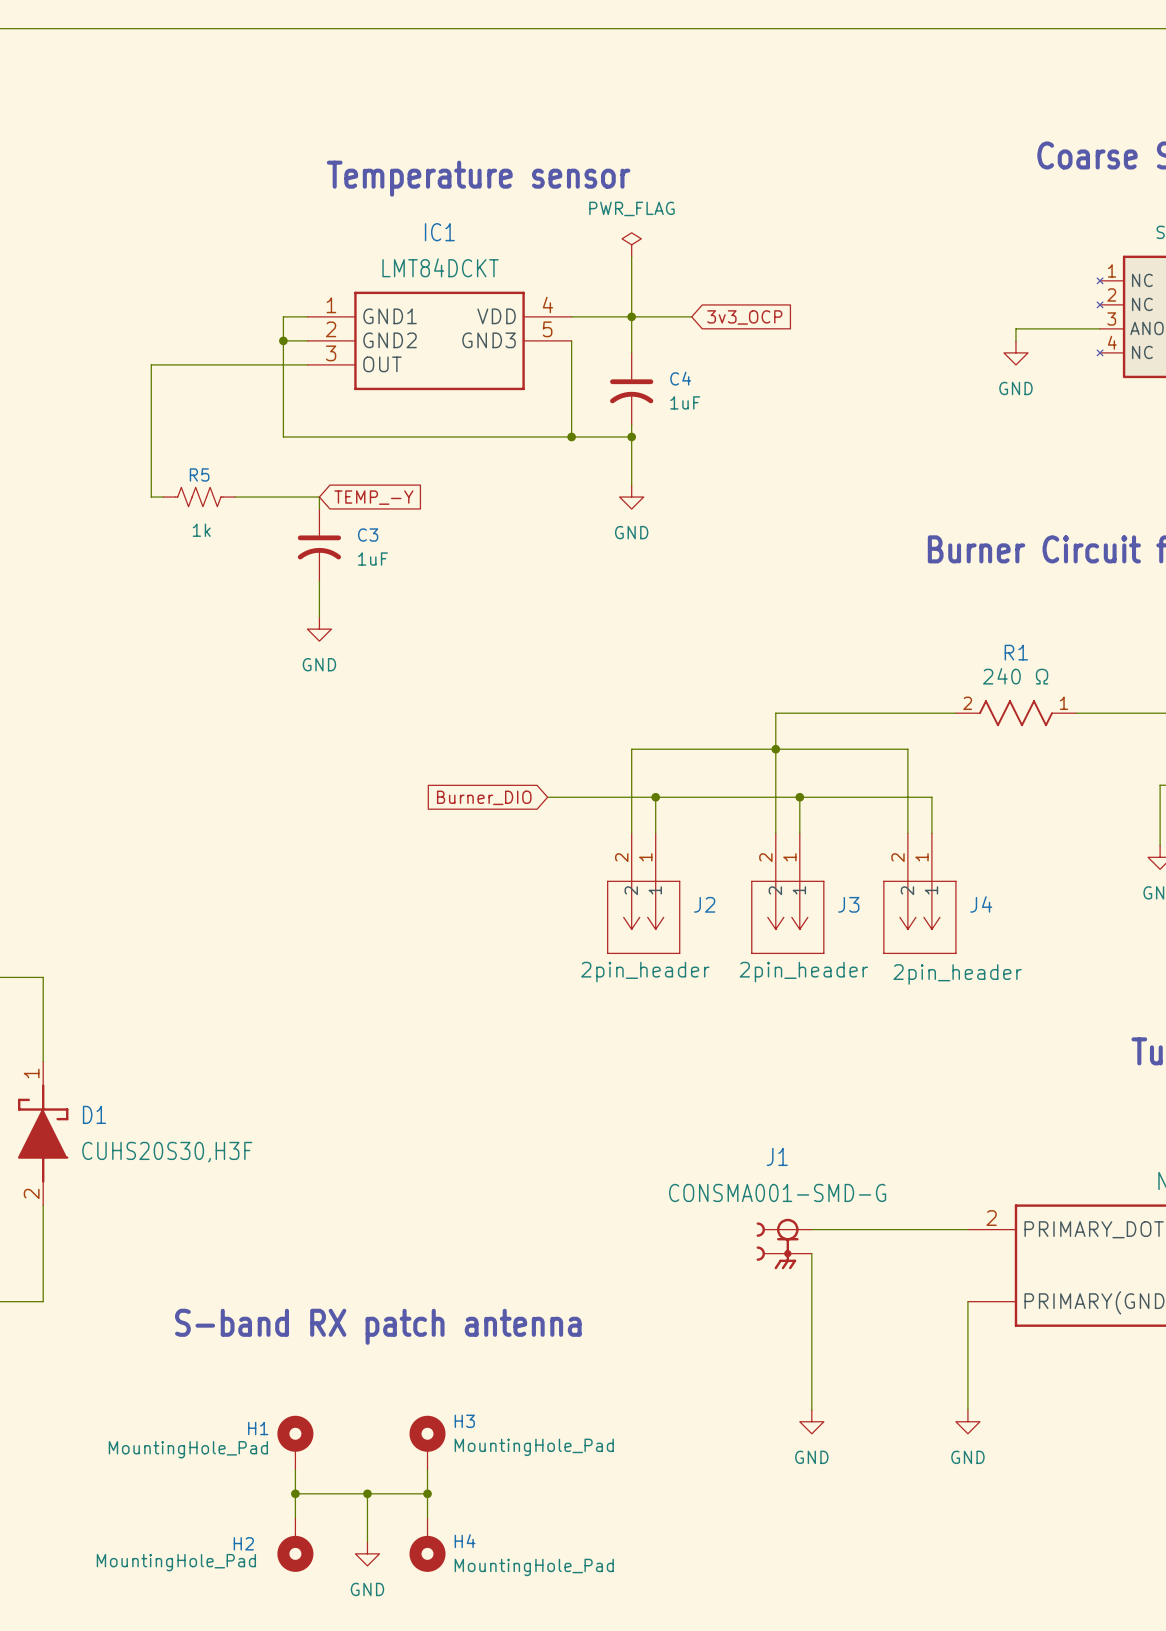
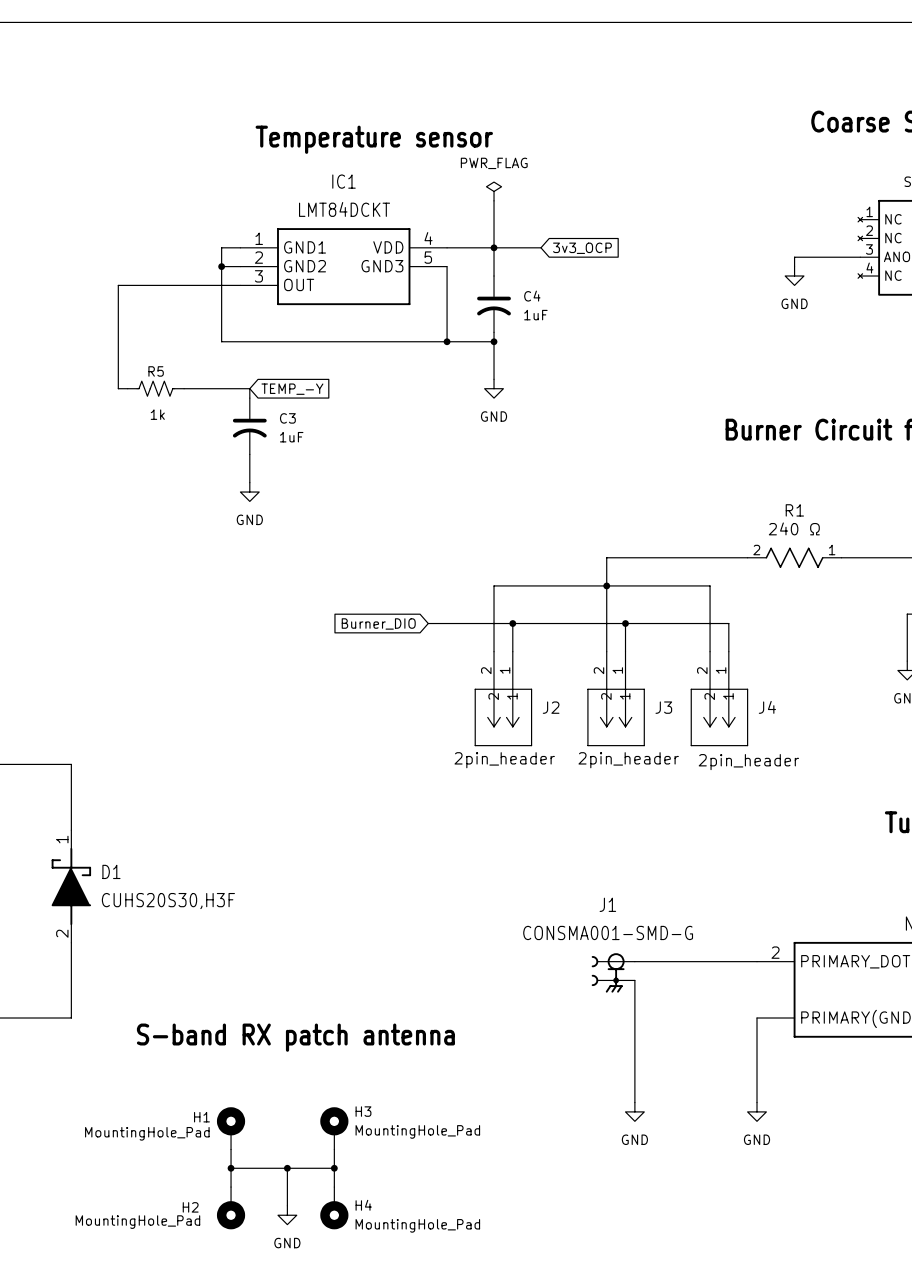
wire: (43, 977) (43, 1061) -> (33, 764) (71, 764) (71, 830)
D1 position: (43, 1133) -> (71, 886)
wire: (43, 1205) (43, 1301) -> (71, 942) (71, 1018) (33, 1018)

